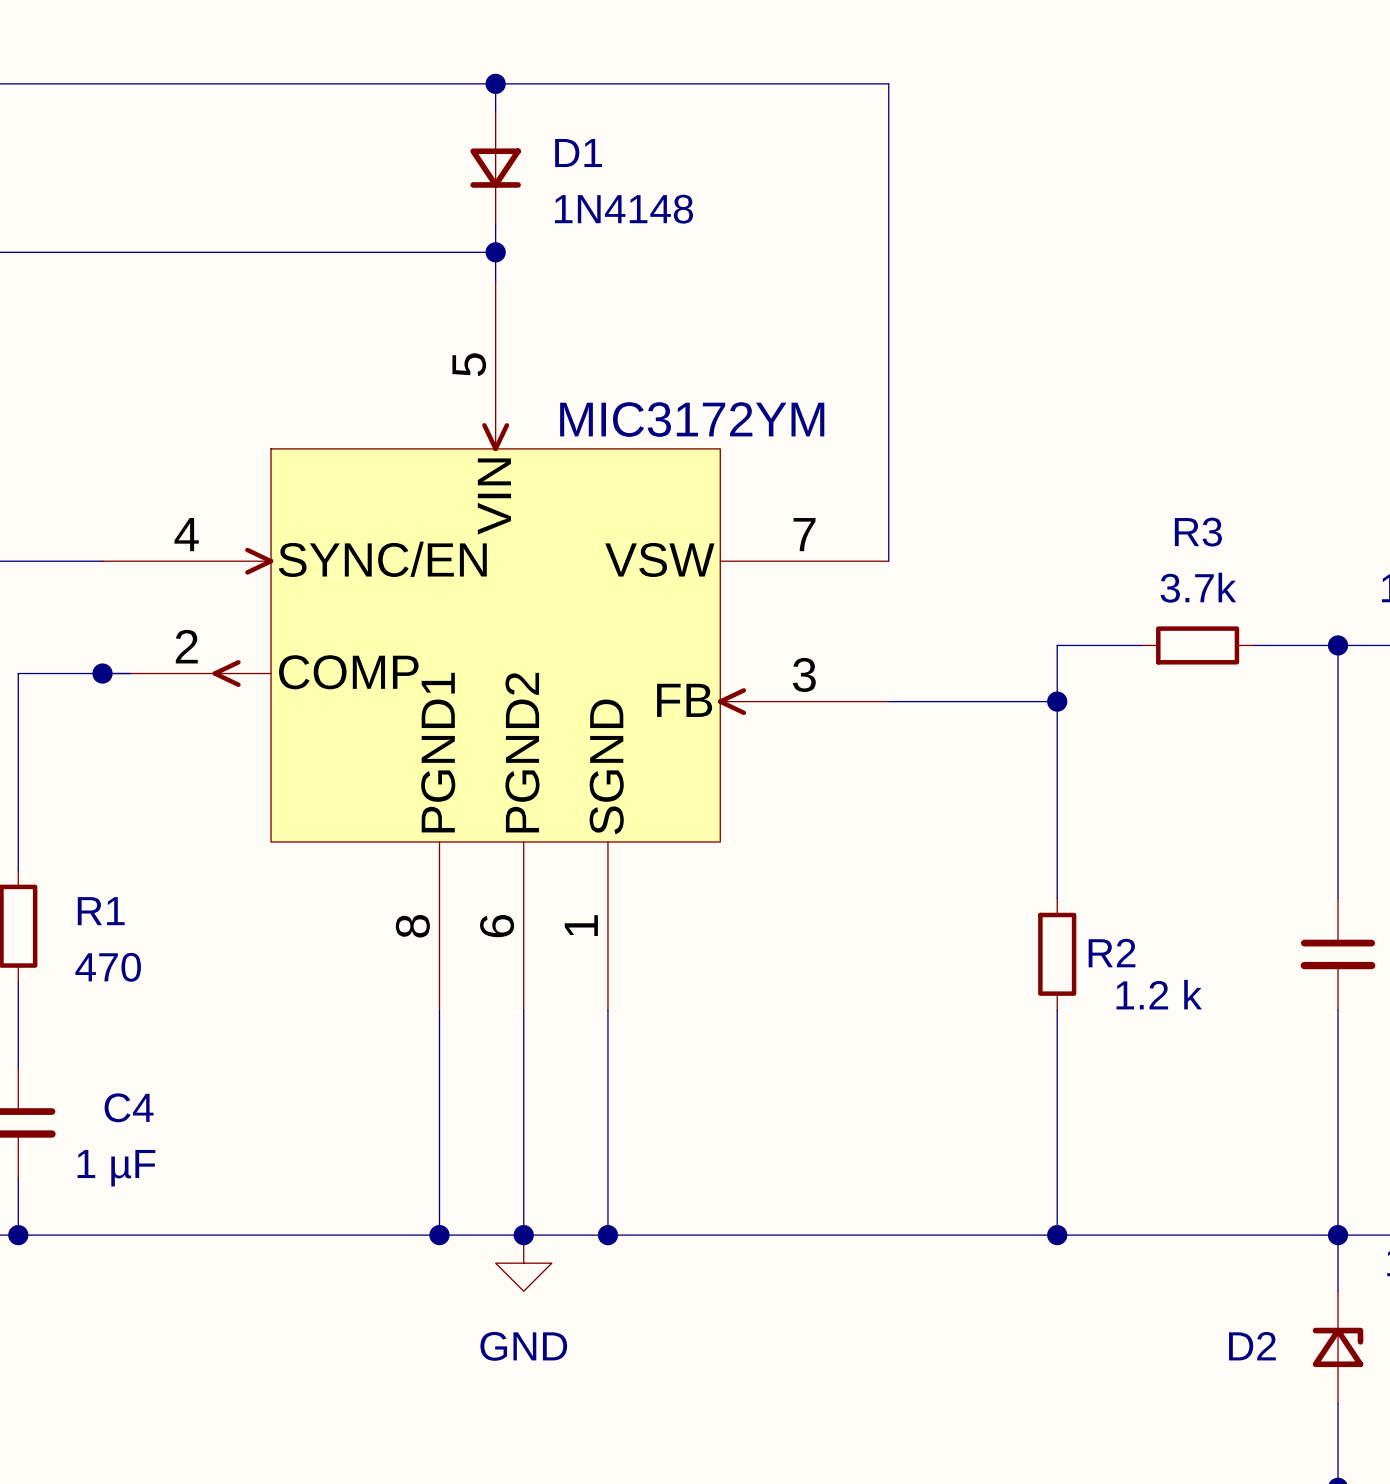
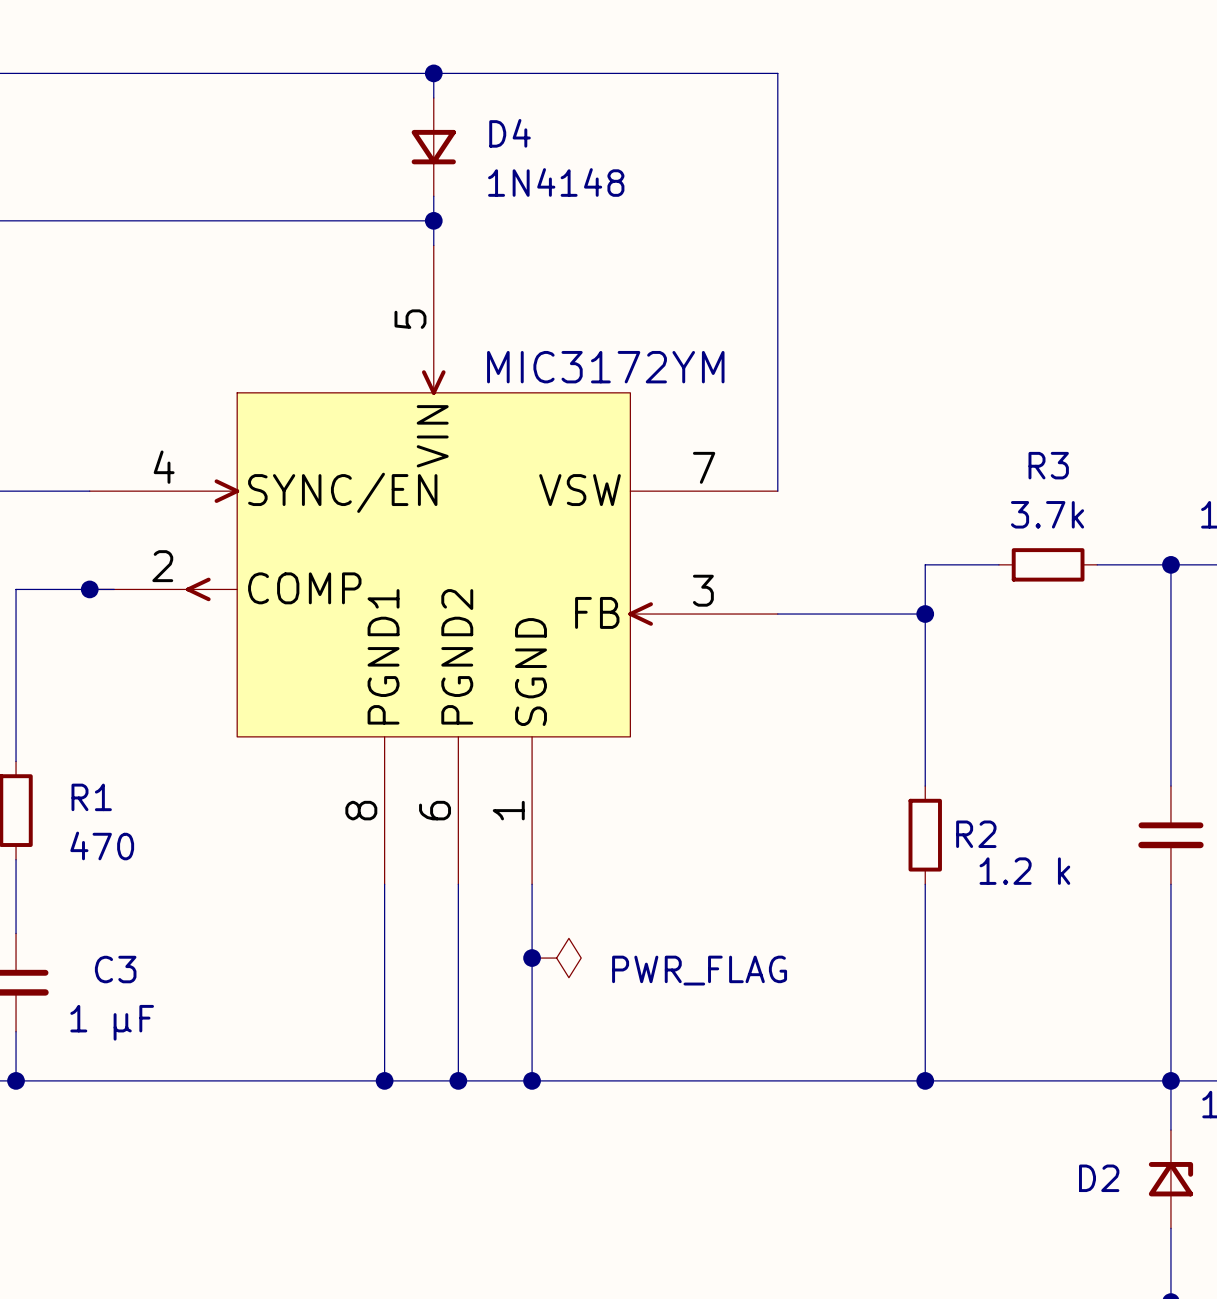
D1 name: D1 (578, 153) -> D4 (510, 133)
junction: none -> (532, 958)
power symbol: none -> PWR_FLAG (556, 958)
C4 name: C4 (129, 1107) -> C3 (115, 969)
power symbol: GND (523, 1263) -> none

